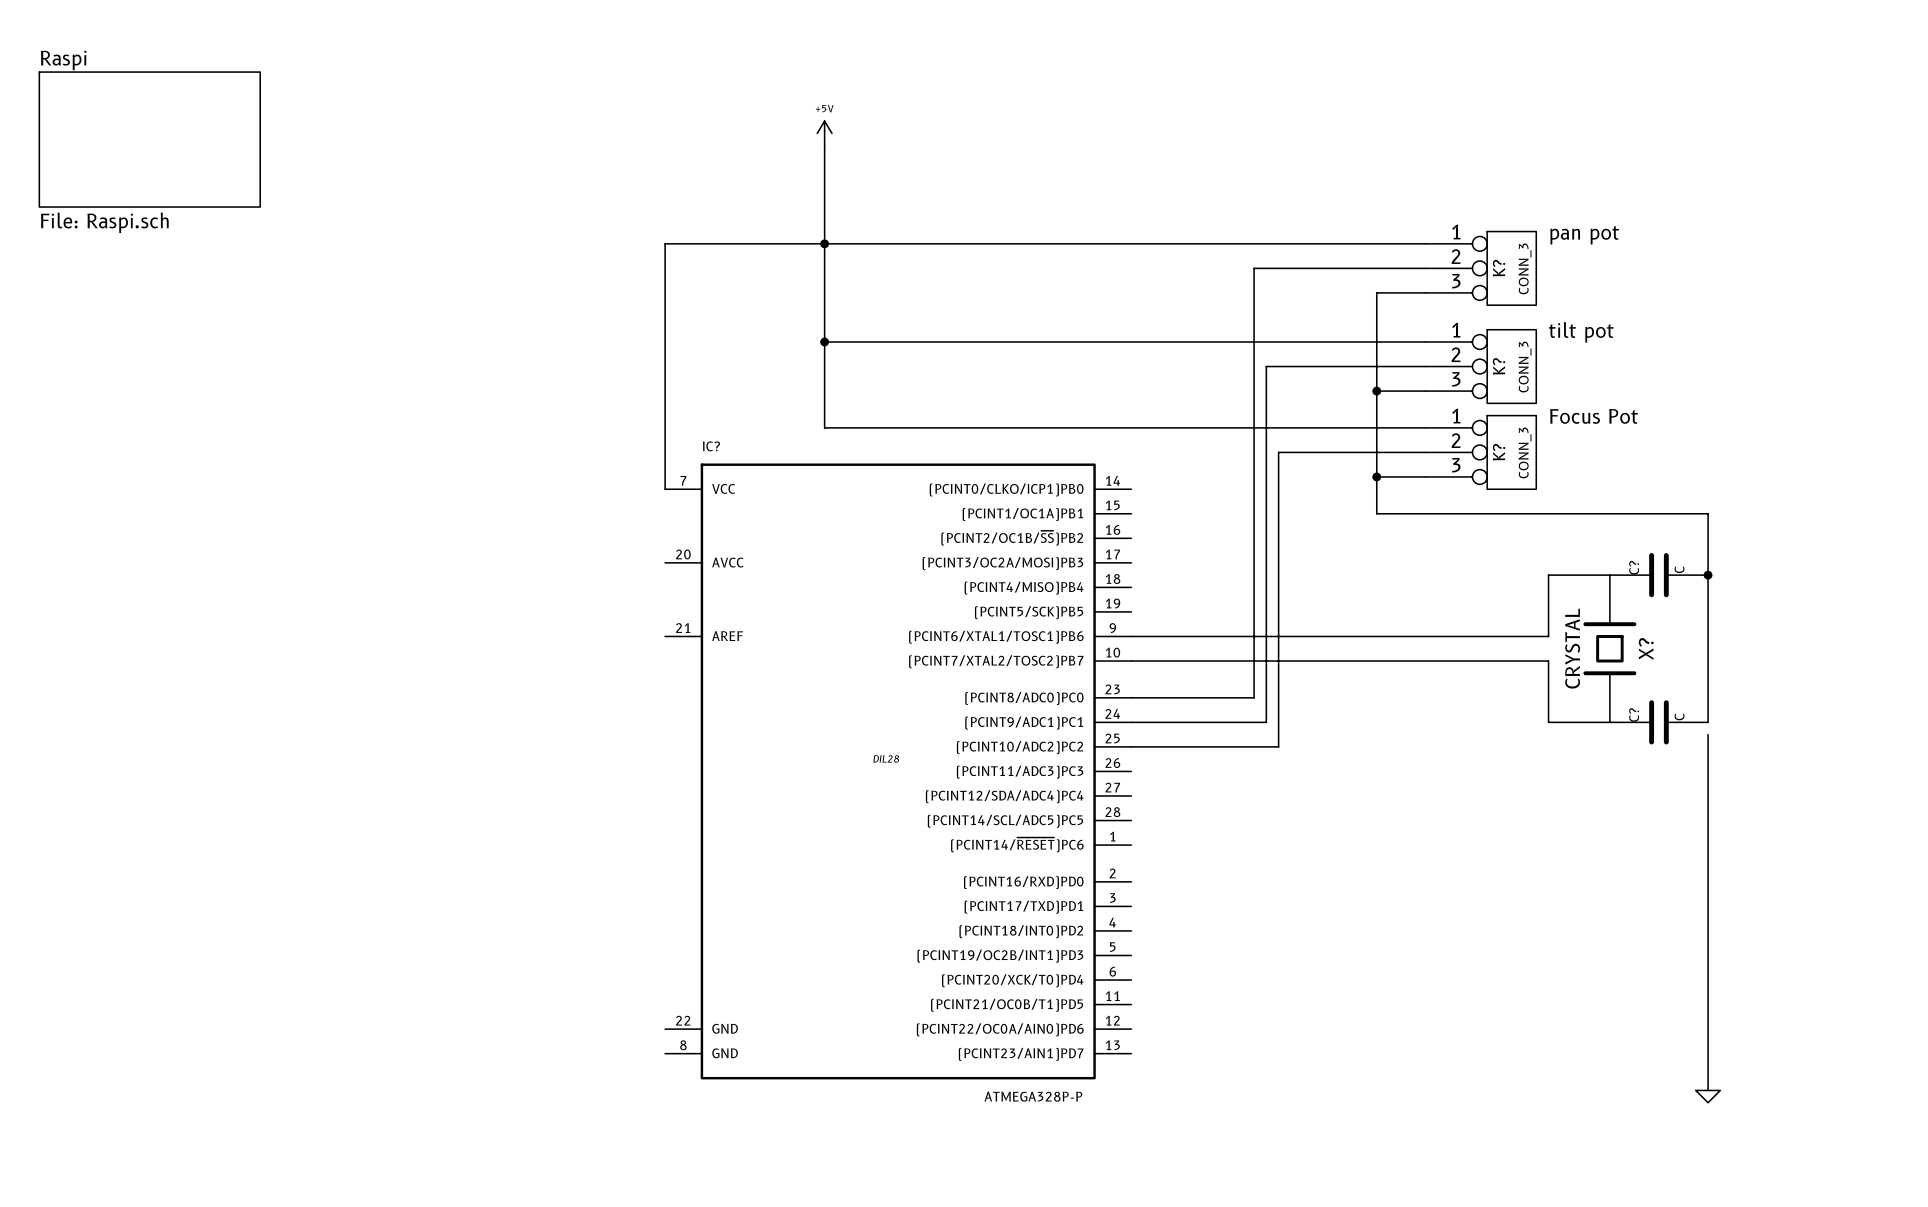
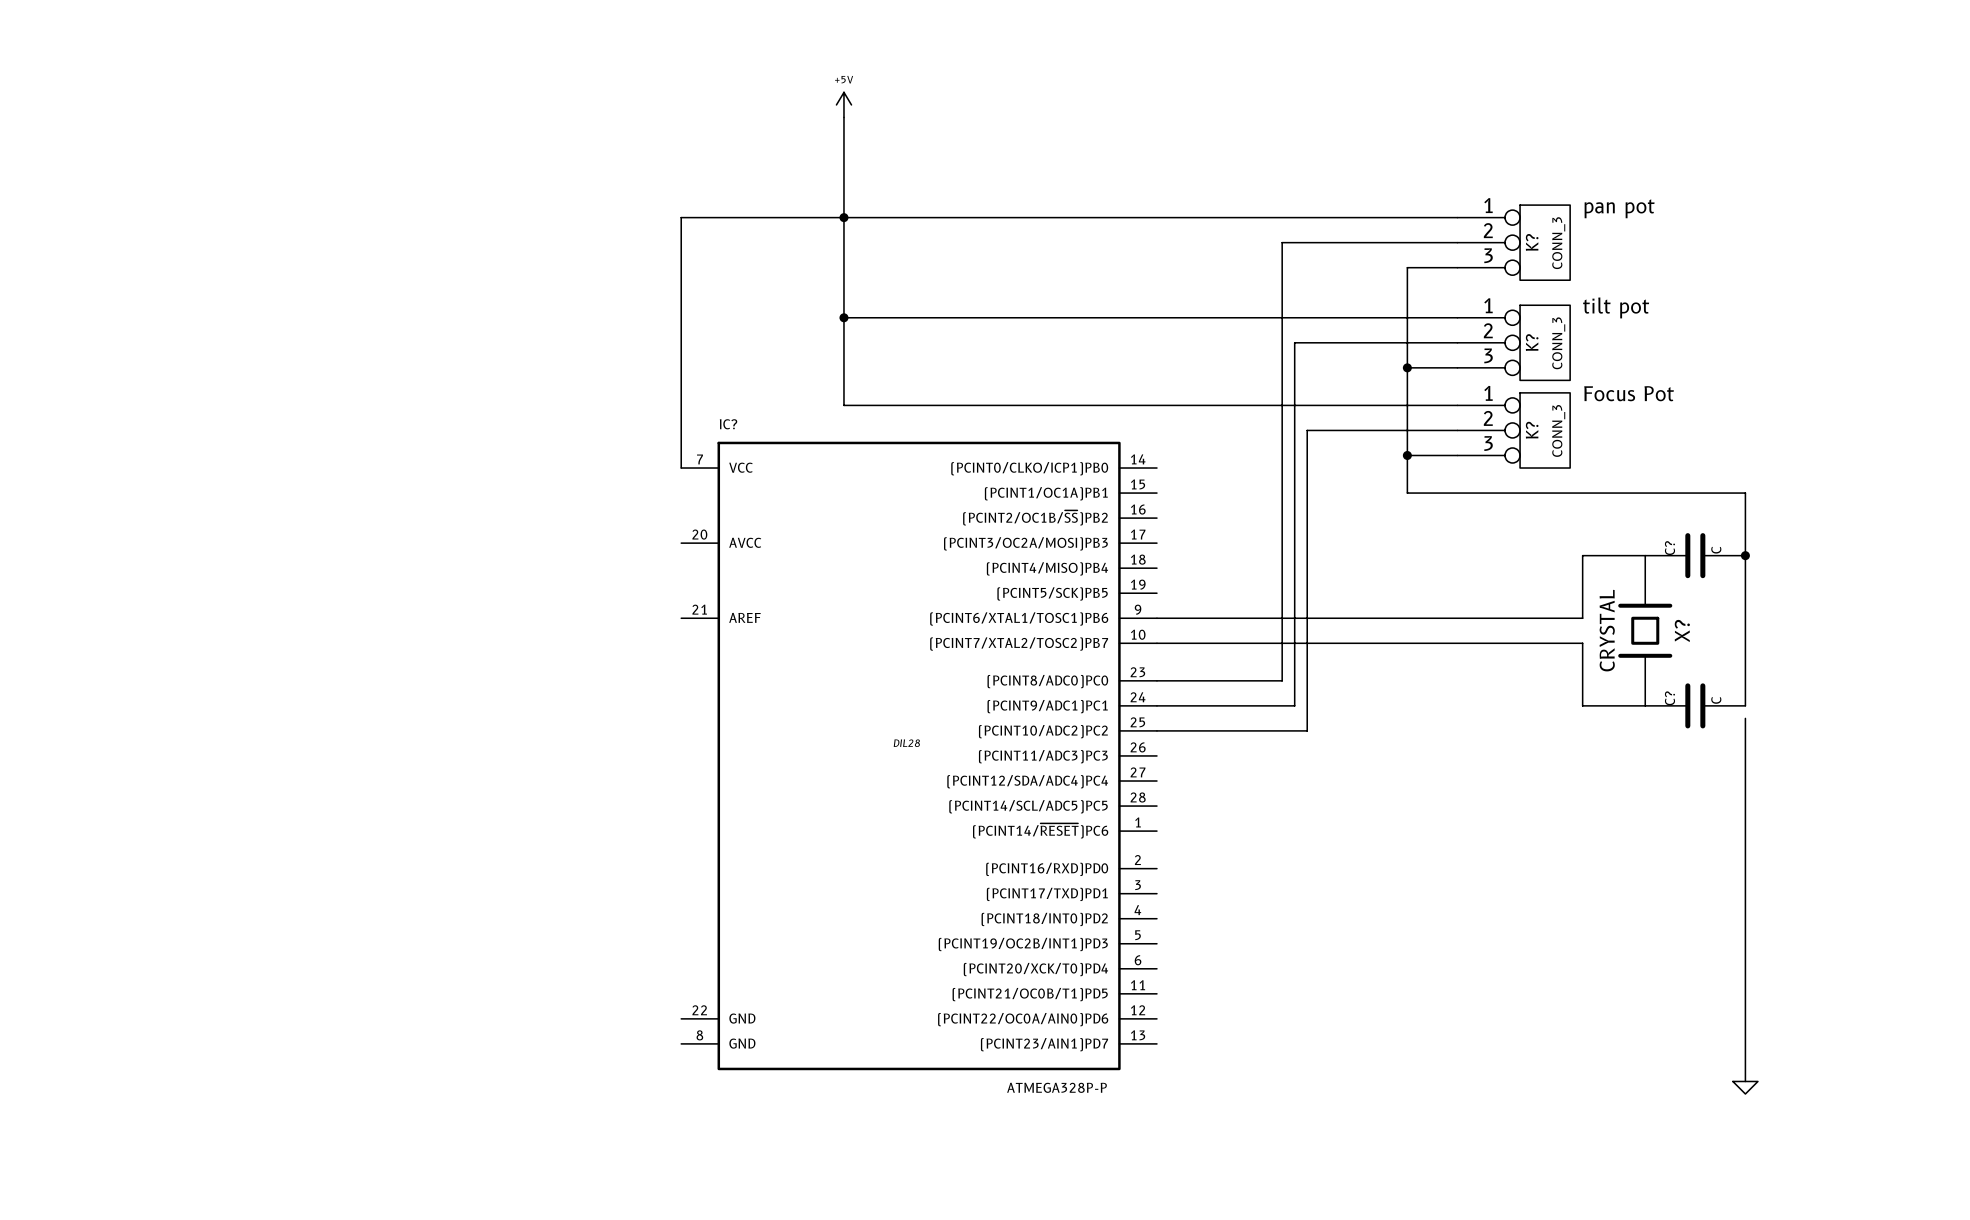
sheet Raspi: File: Raspi.sch (149, 139) -> none

